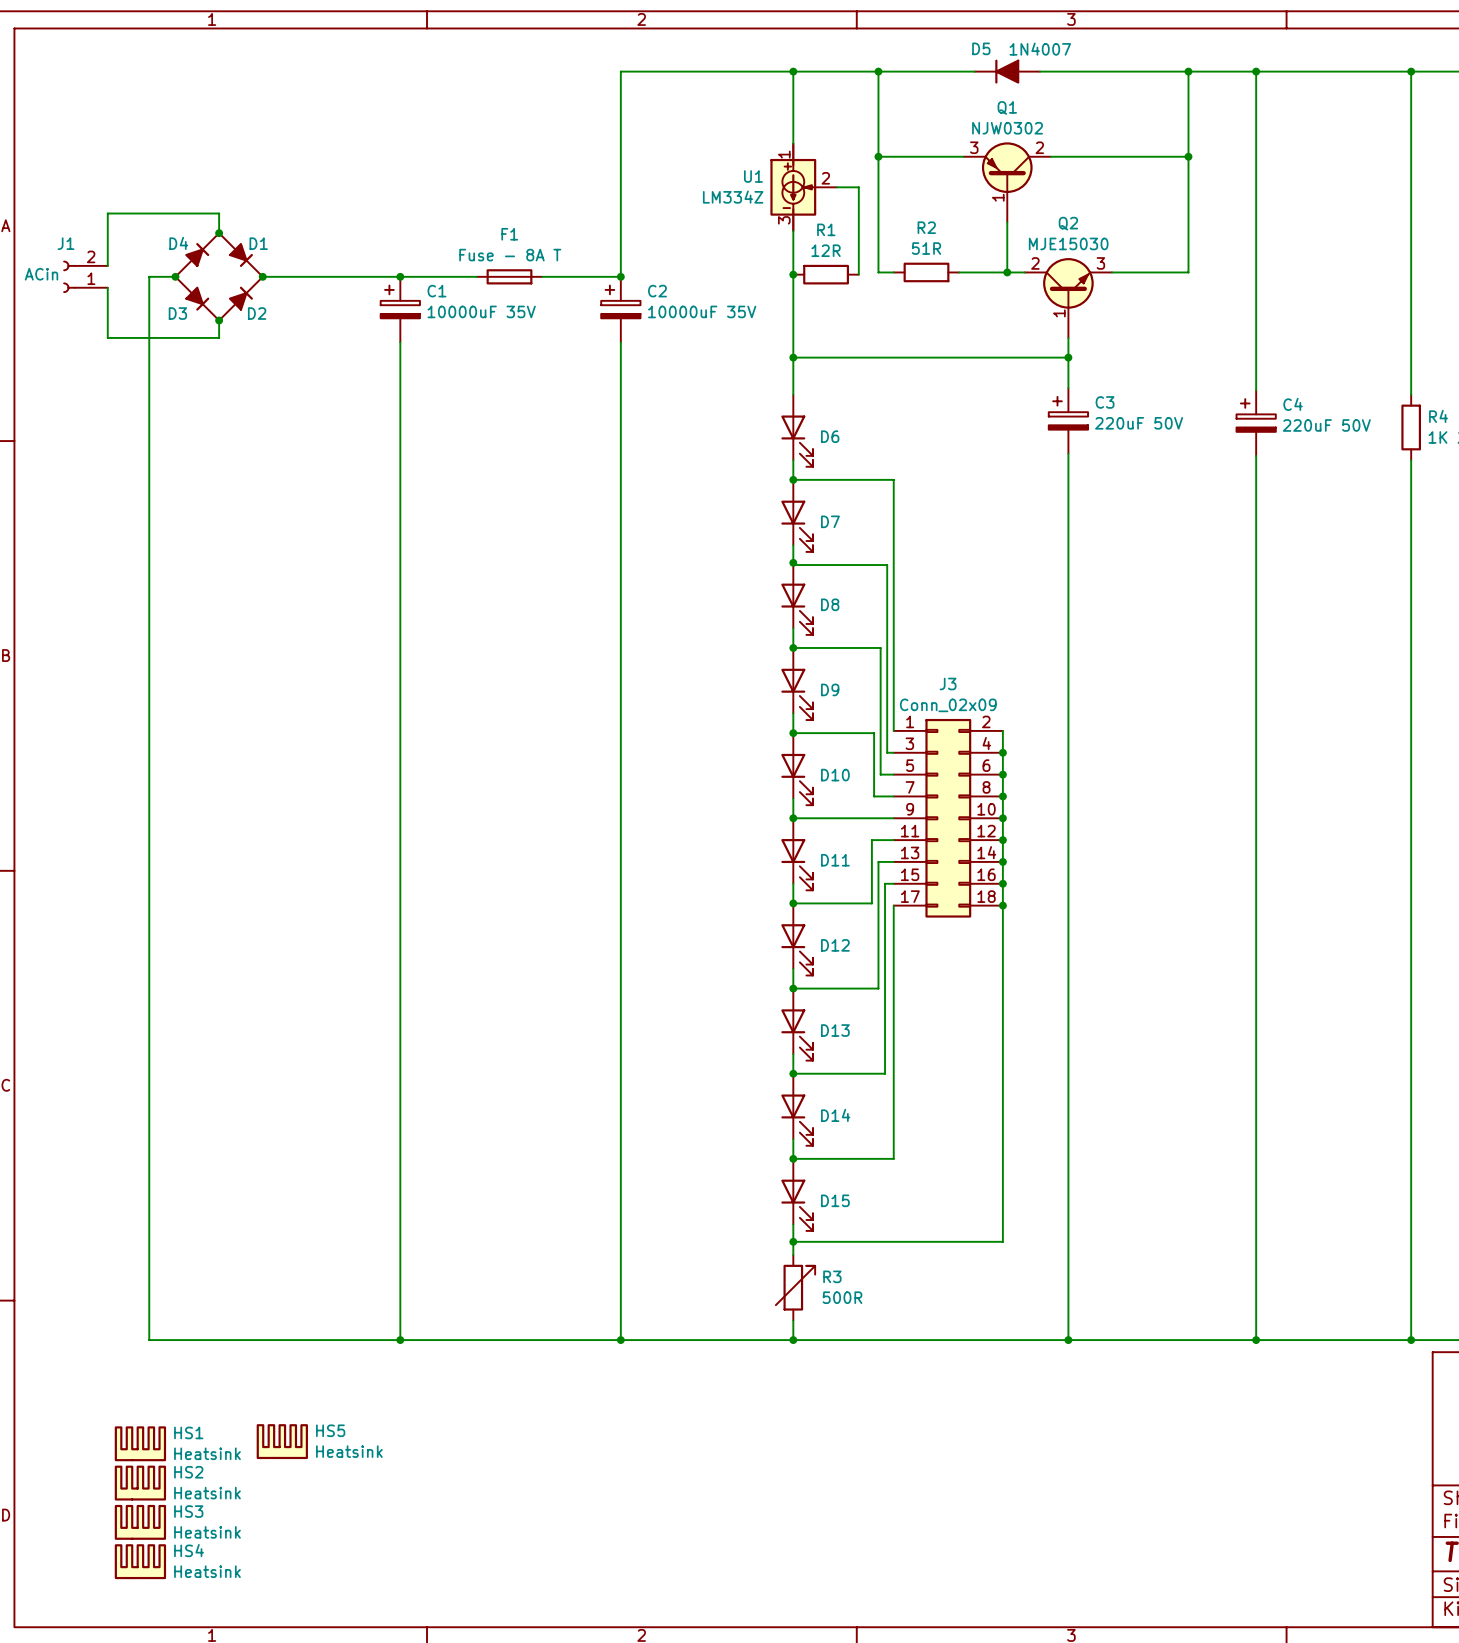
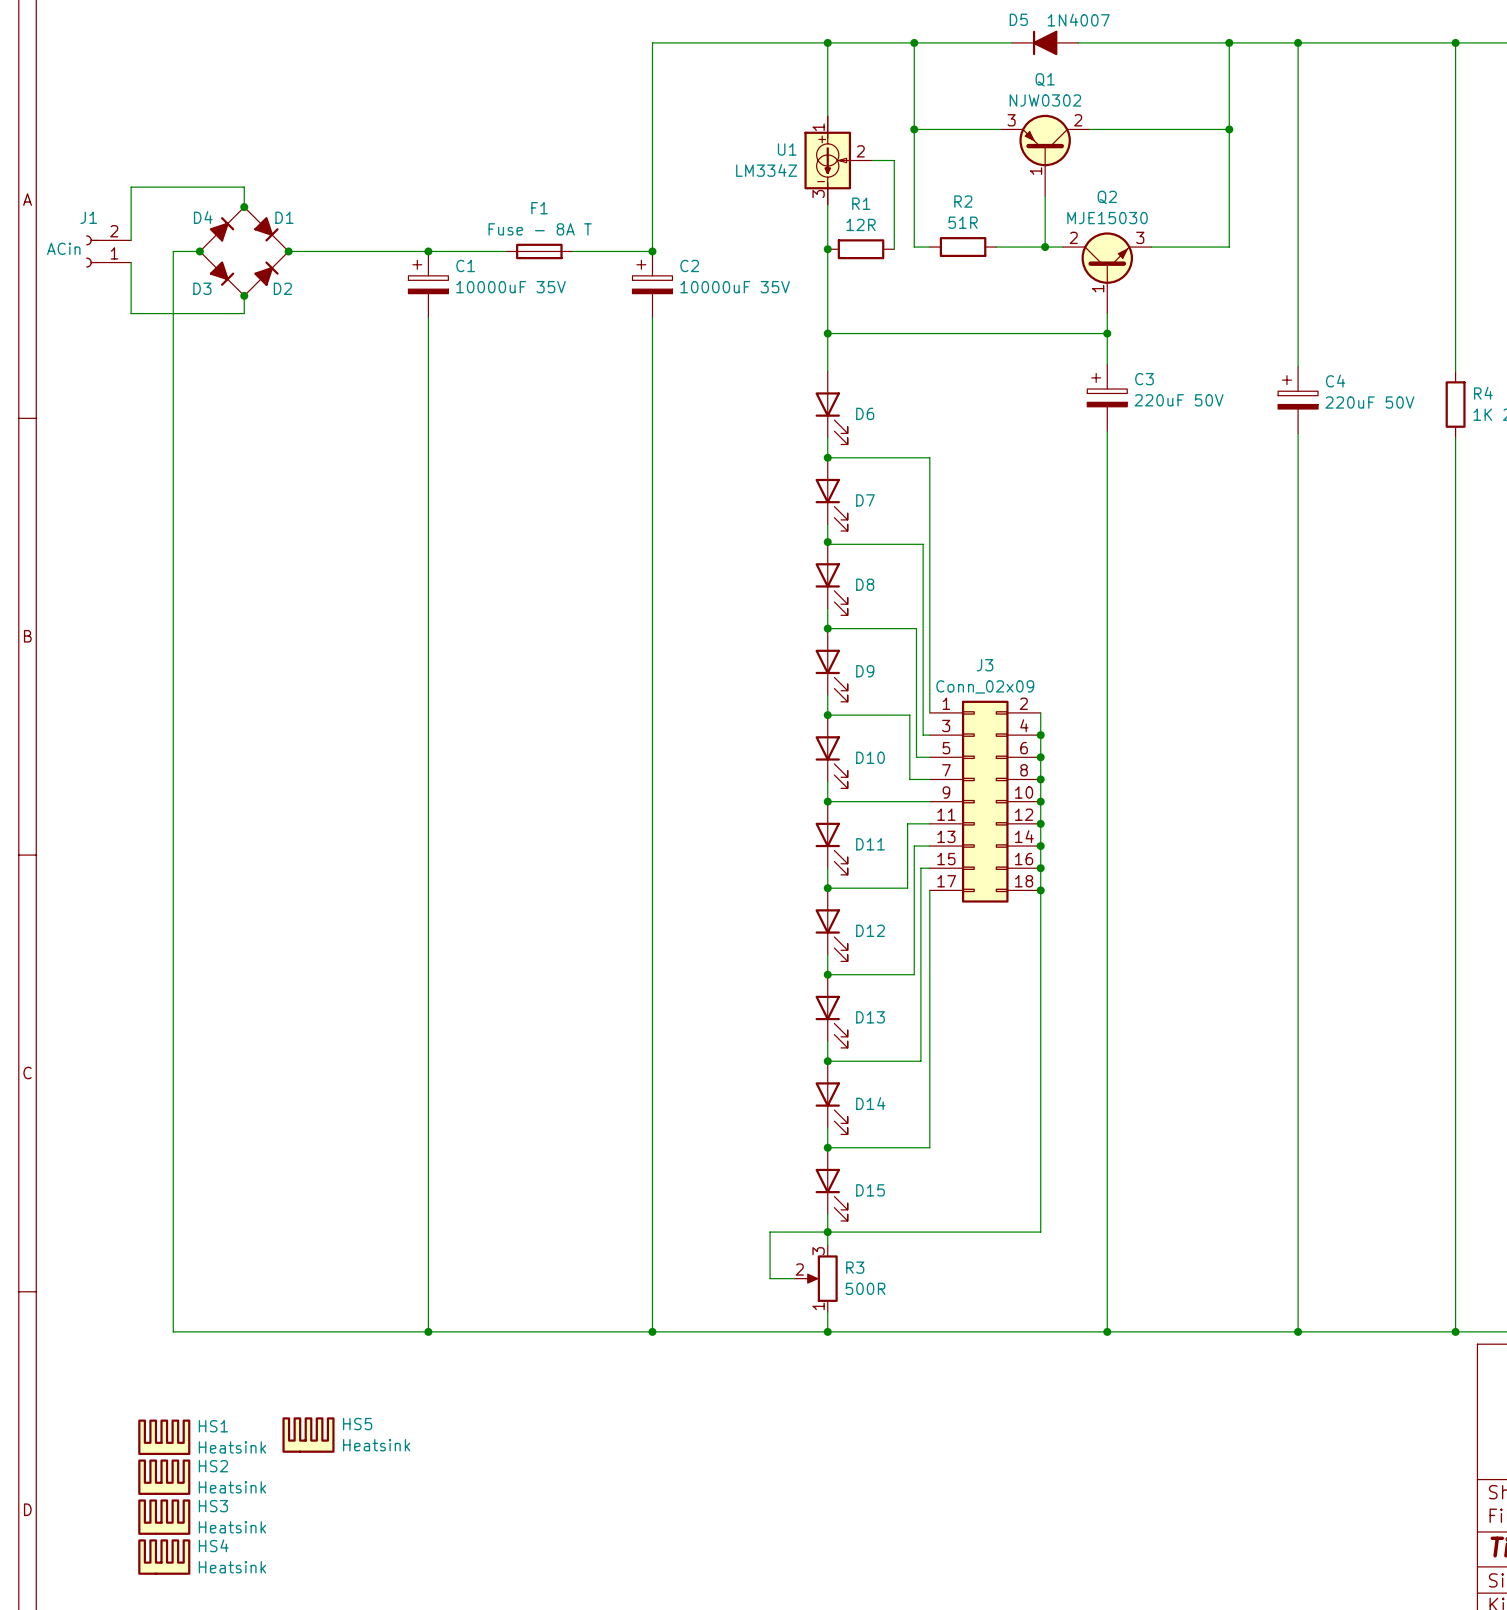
wire: none -> (827, 1232) (770, 1232) (770, 1278) (794, 1278)
R3 symbol: [775, 1254, 816, 1321] -> [794, 1245, 838, 1312]

